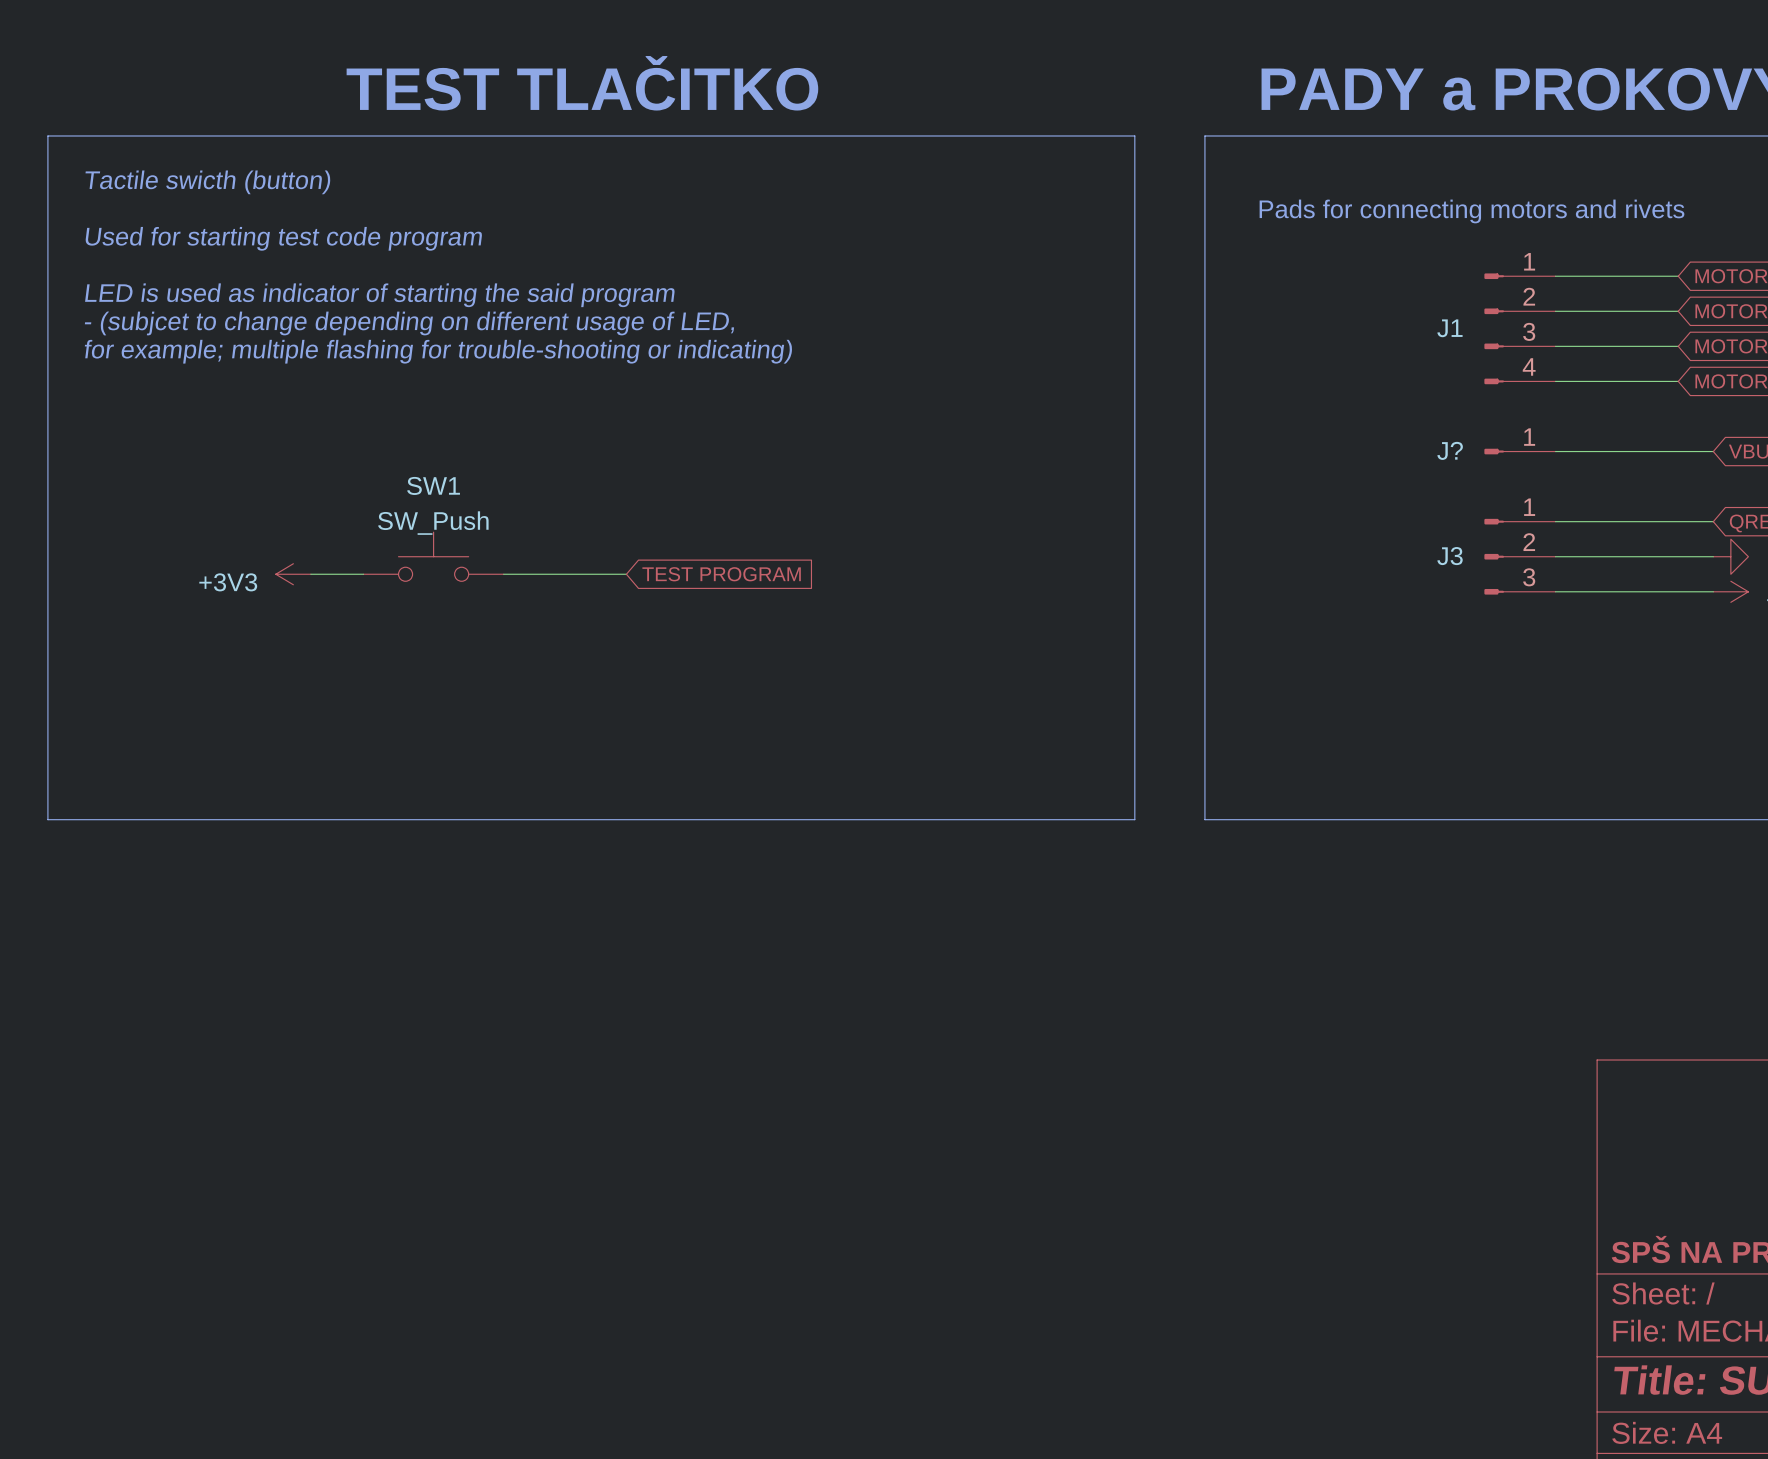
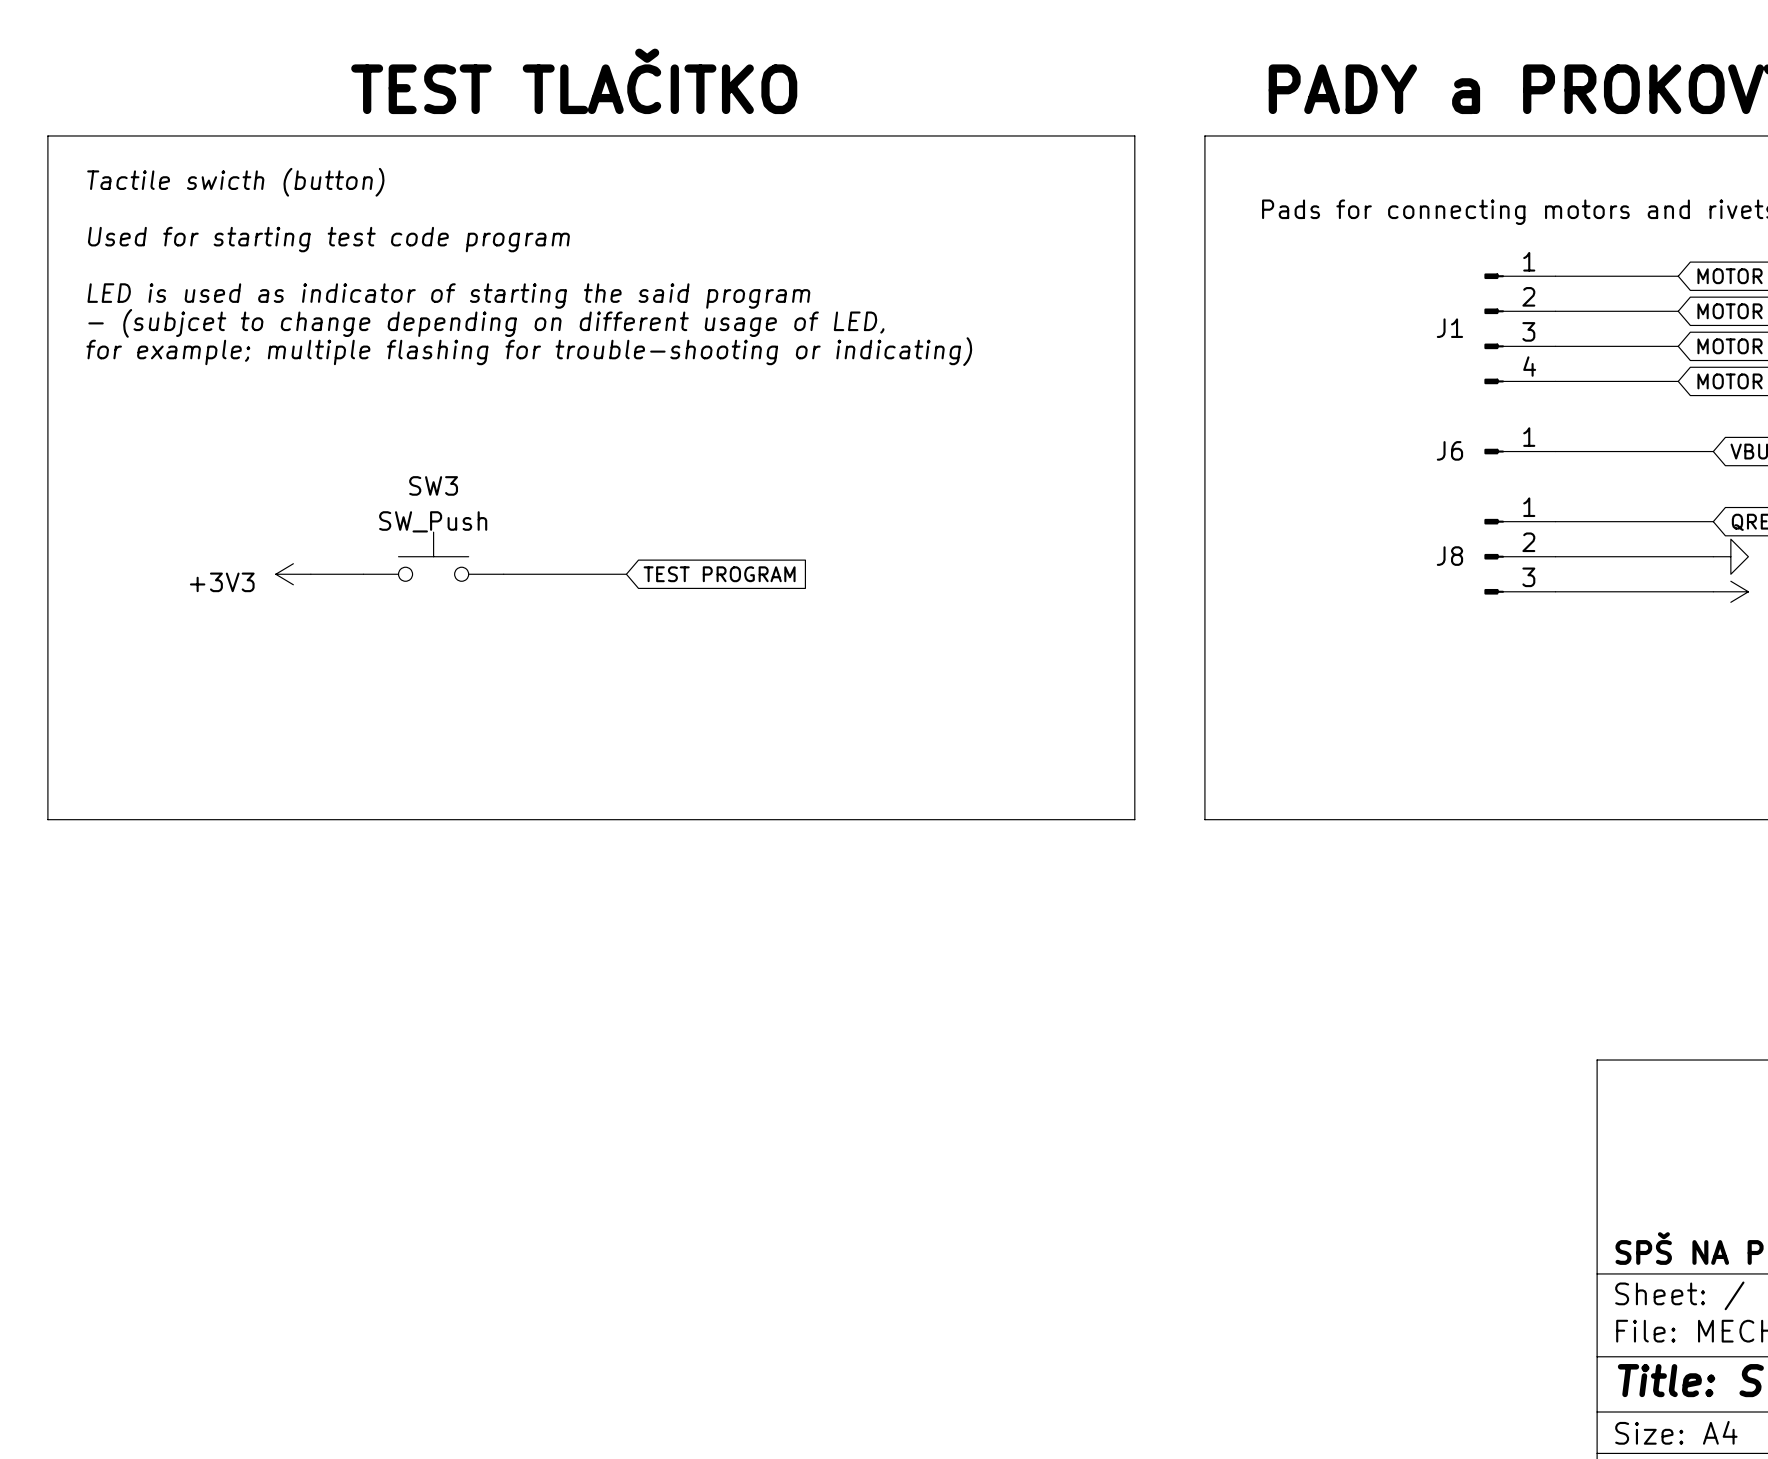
J? name: J? (1450, 450) -> J6 (1449, 450)
SW1 name: SW1 (433, 485) -> SW3 (433, 485)
J3 name: J3 (1450, 556) -> J8 (1449, 556)

